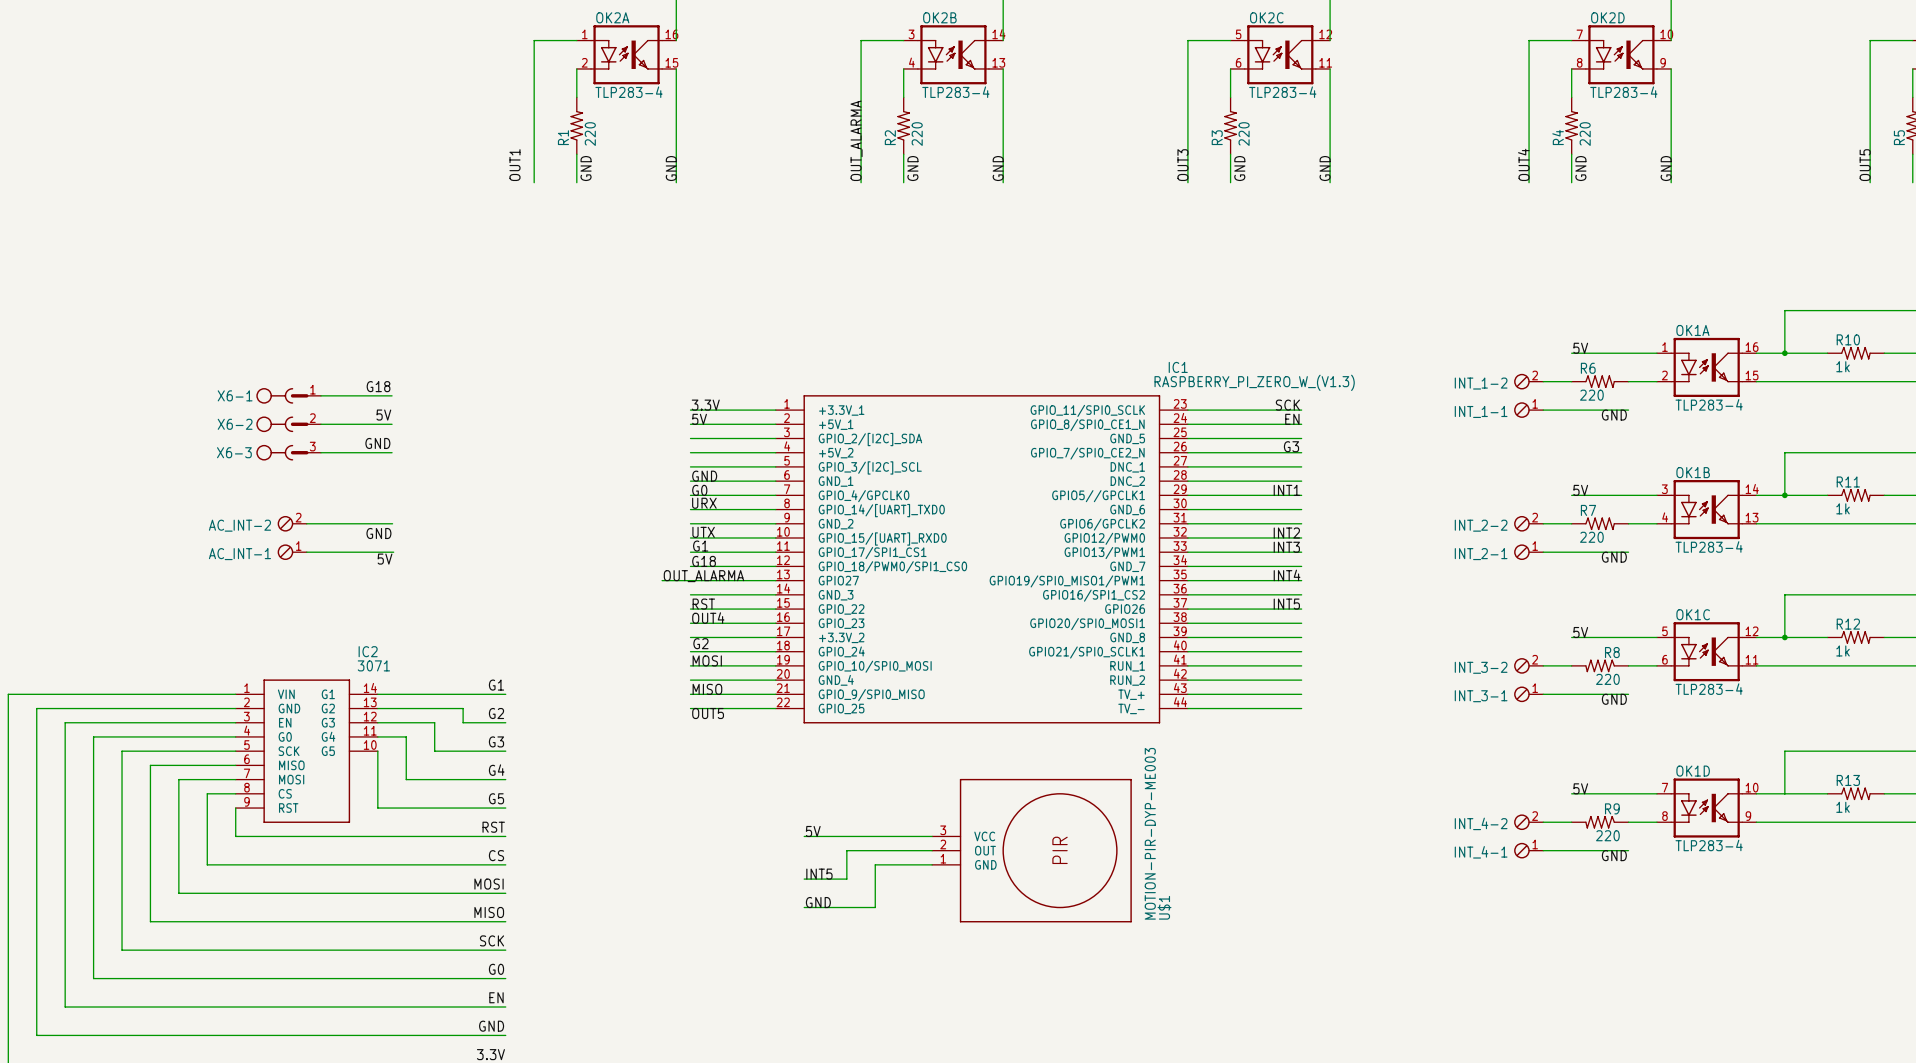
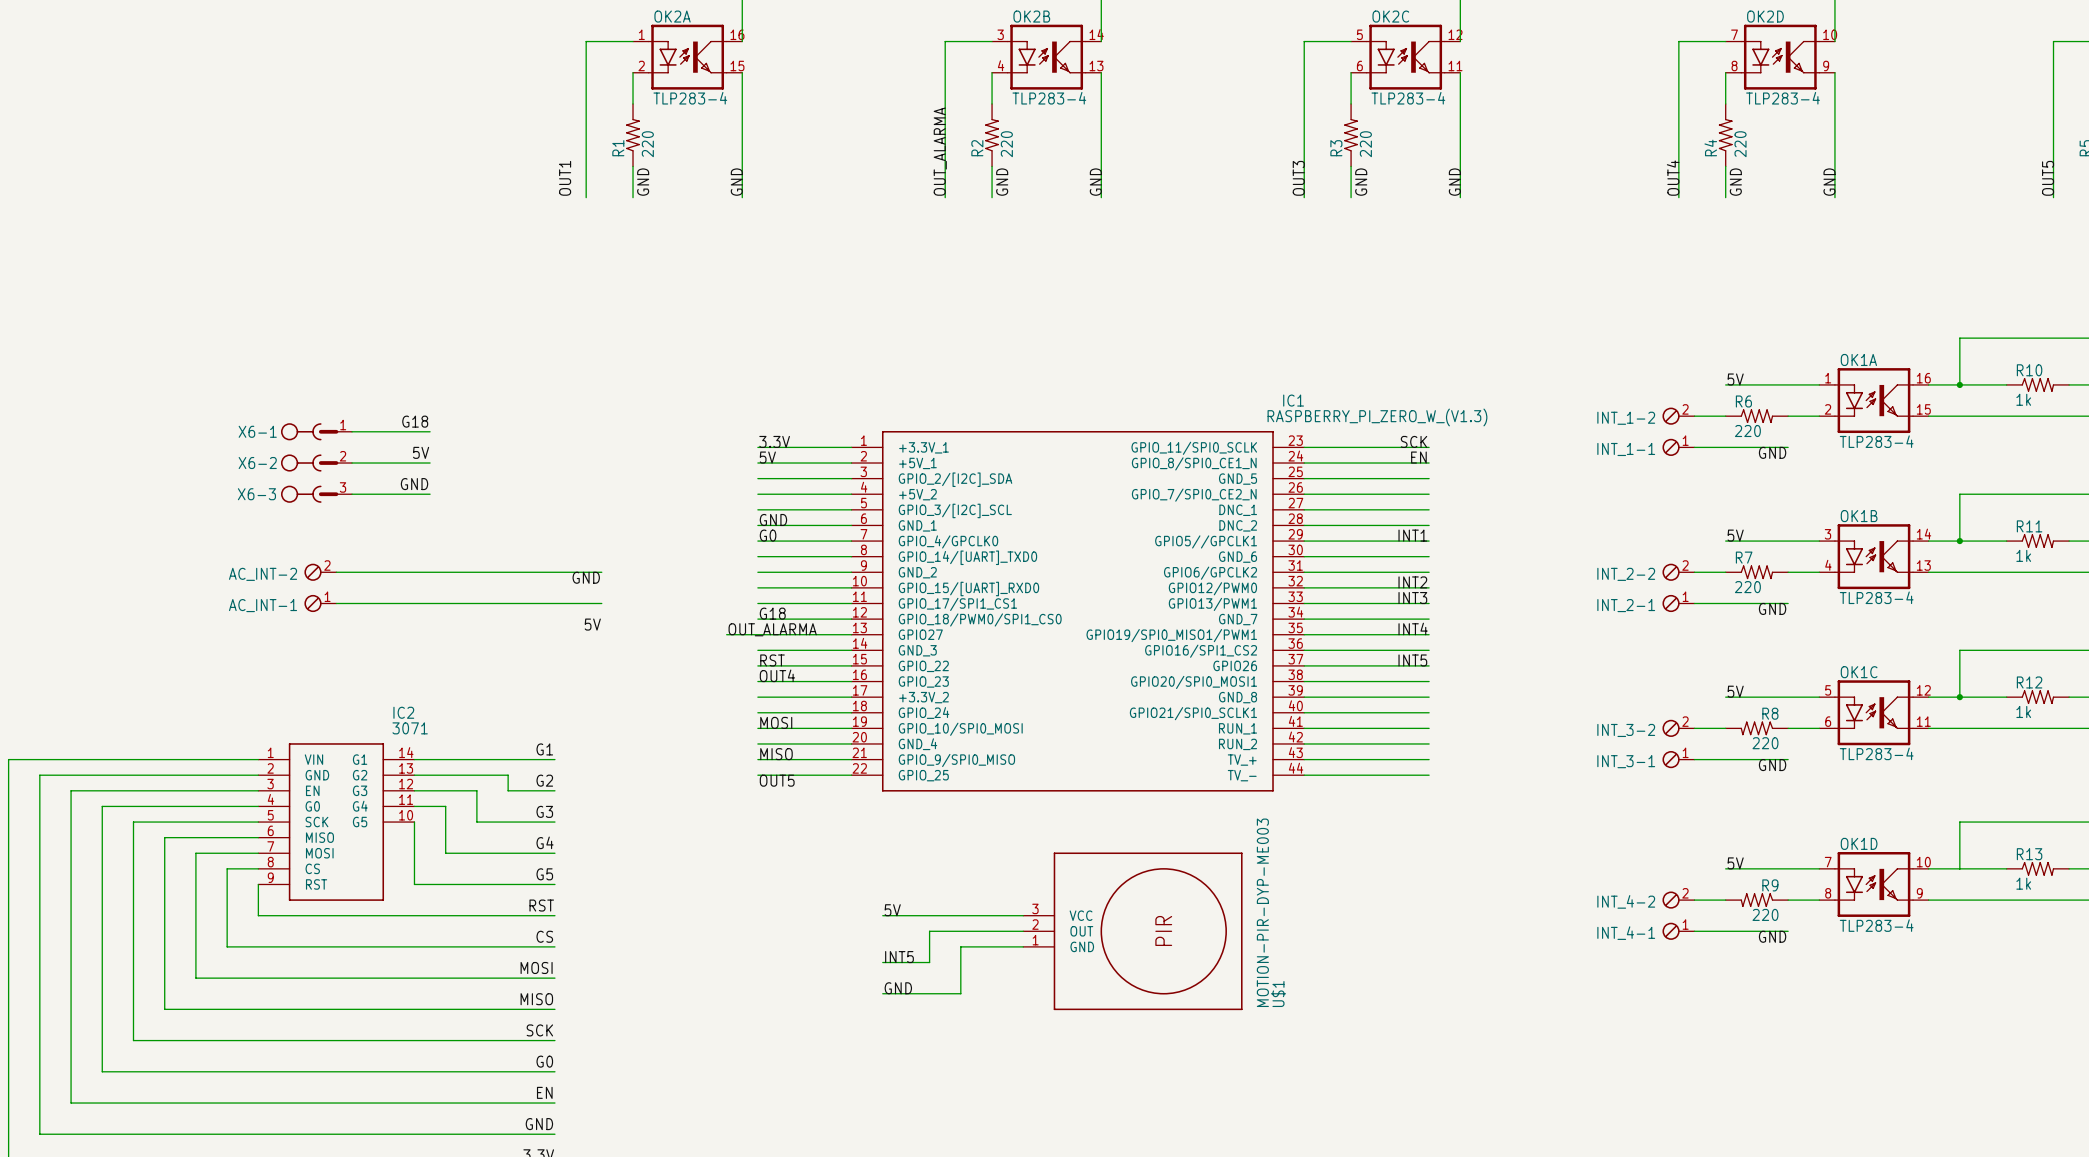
label: G3 (1291, 446) -> none
label: URX (704, 503) -> none
wire: none -> (430, 572) (601, 572)
label: none -> GND (586, 577)
label: UTX (703, 532) -> none
label: GND (378, 533) -> none
label: G1 (700, 546) -> none
wire: none -> (431, 603) (601, 603)
label: 5V (385, 559) -> none
label: none -> 5V (592, 624)
label: G2 (700, 643) -> none

